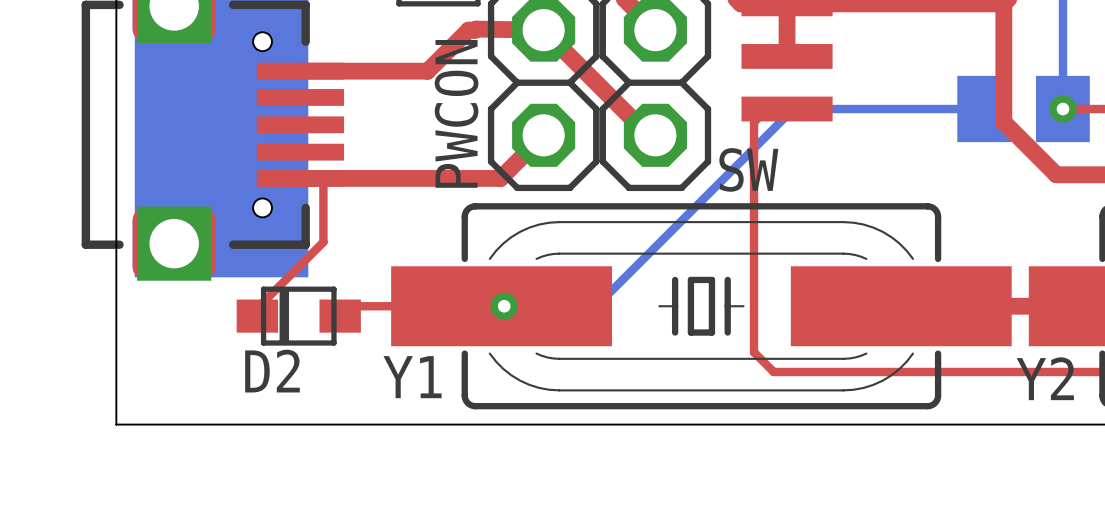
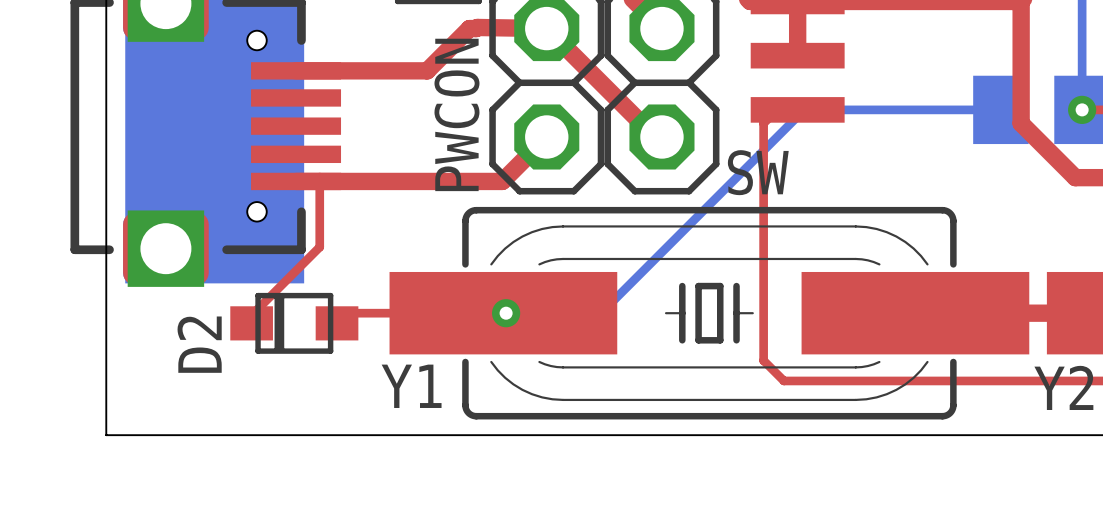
D2 name rotation: 0° (272, 371) -> 90° counterclockwise (199, 344)

